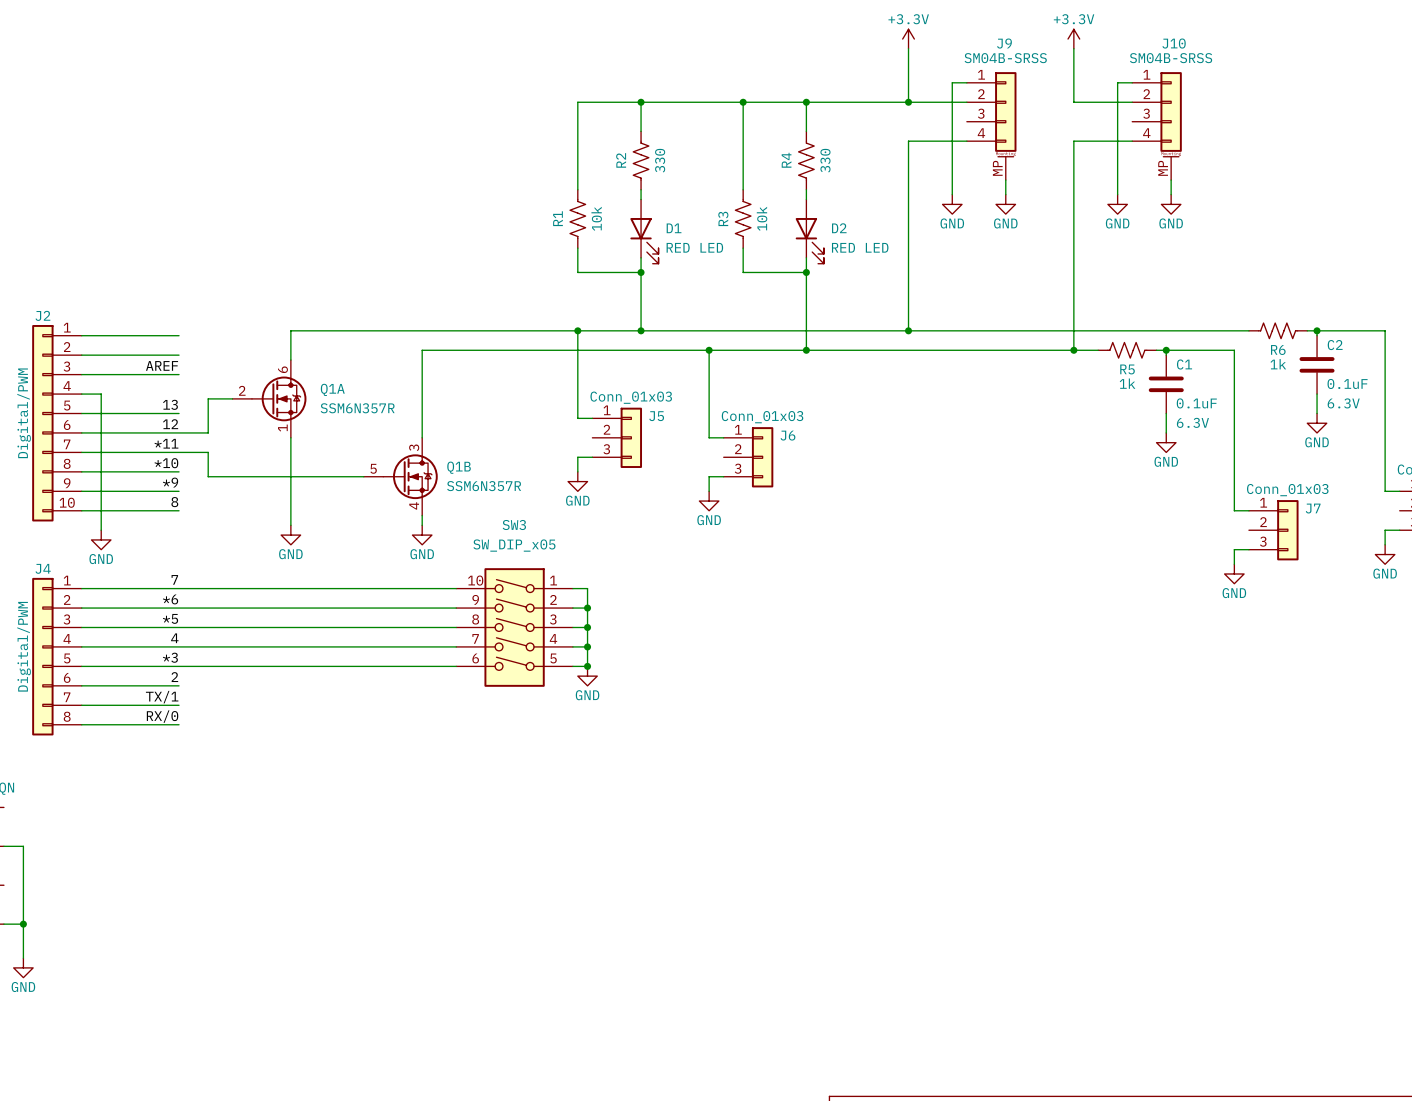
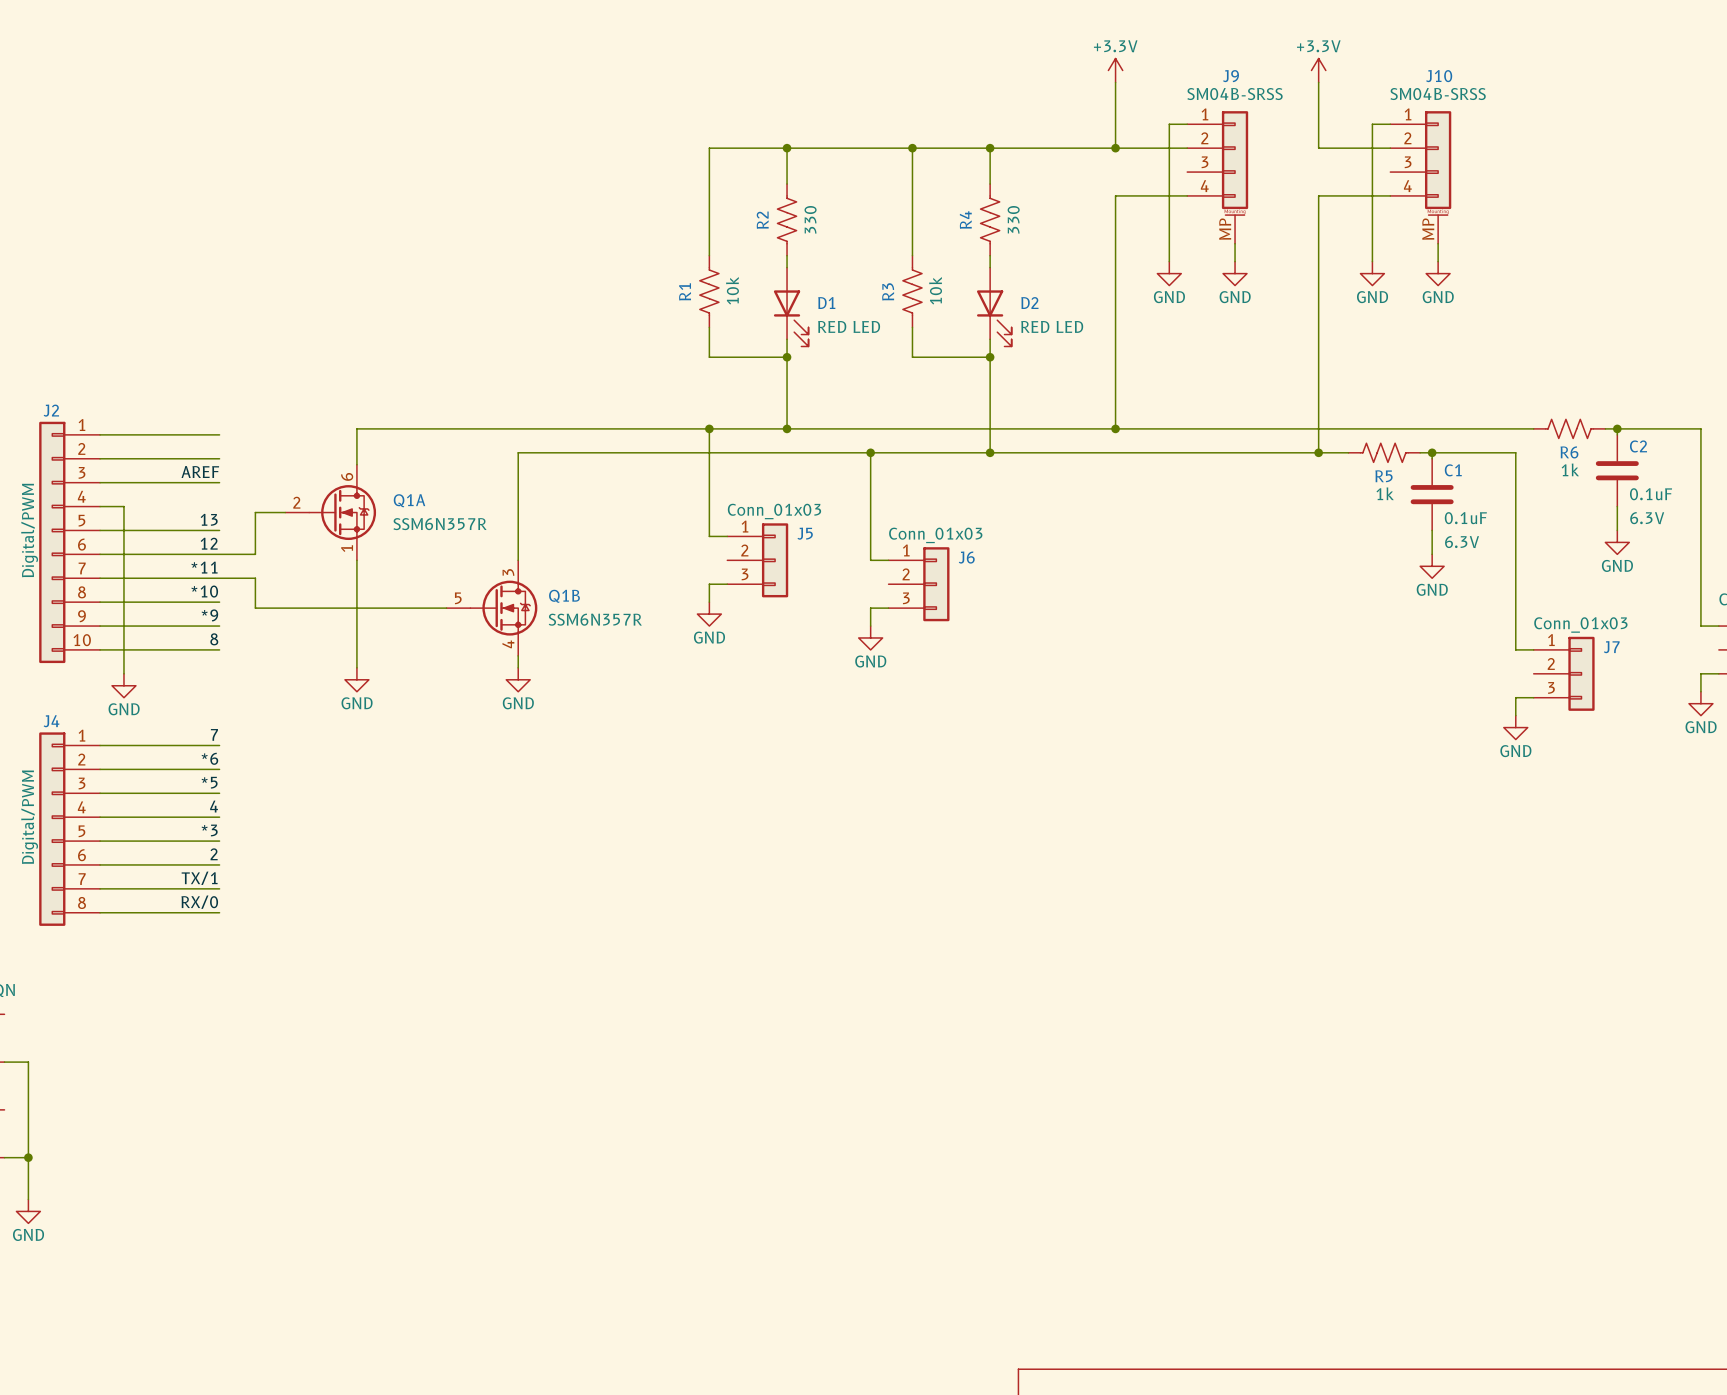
wire: (179, 588) (456, 588) -> none
wire: (572, 588) (587, 588) (587, 666) (572, 666) -> none
wire: (179, 608) (456, 608) -> none
wire: (572, 608) (587, 608) -> none
junction: (587, 608) -> none
wire: (179, 627) (456, 627) -> none
SW3: SW_DIP_x05 (514, 627) -> none
wire: (572, 627) (587, 627) -> none
junction: (587, 627) -> none
wire: (179, 646) (456, 646) -> none
wire: (572, 646) (587, 646) -> none
junction: (587, 646) -> none
wire: (179, 666) (456, 666) -> none
junction: (587, 666) -> none
power symbol: GND (587, 676) -> none

